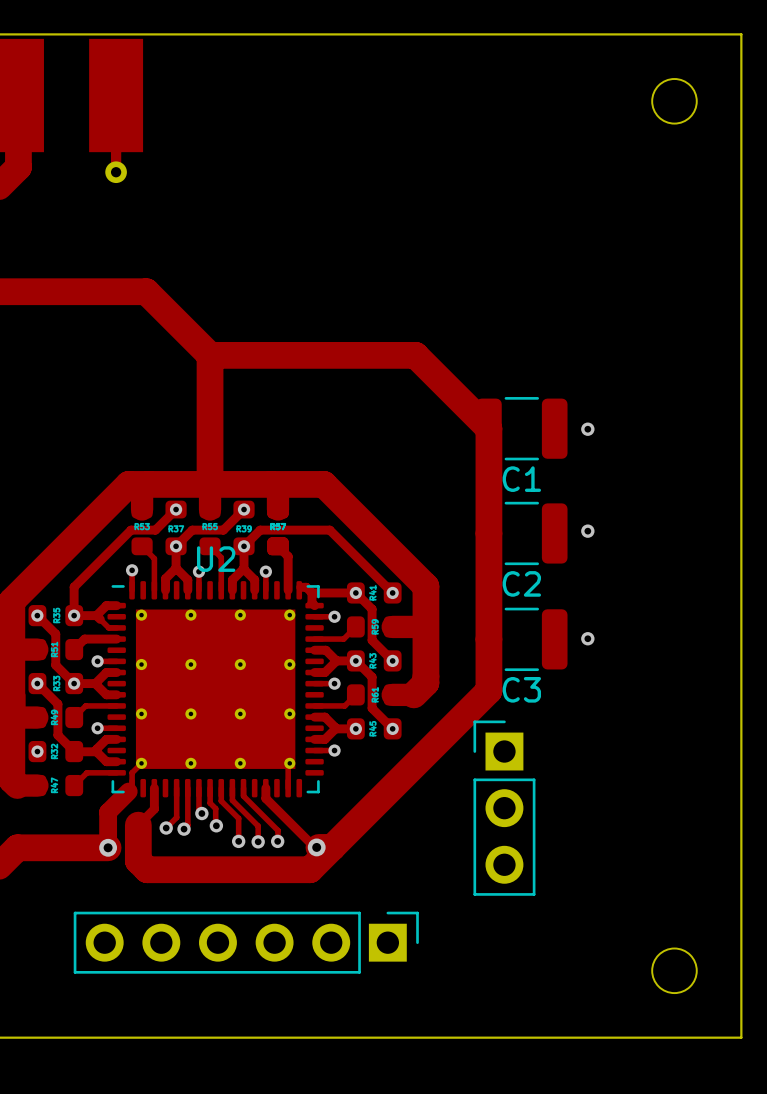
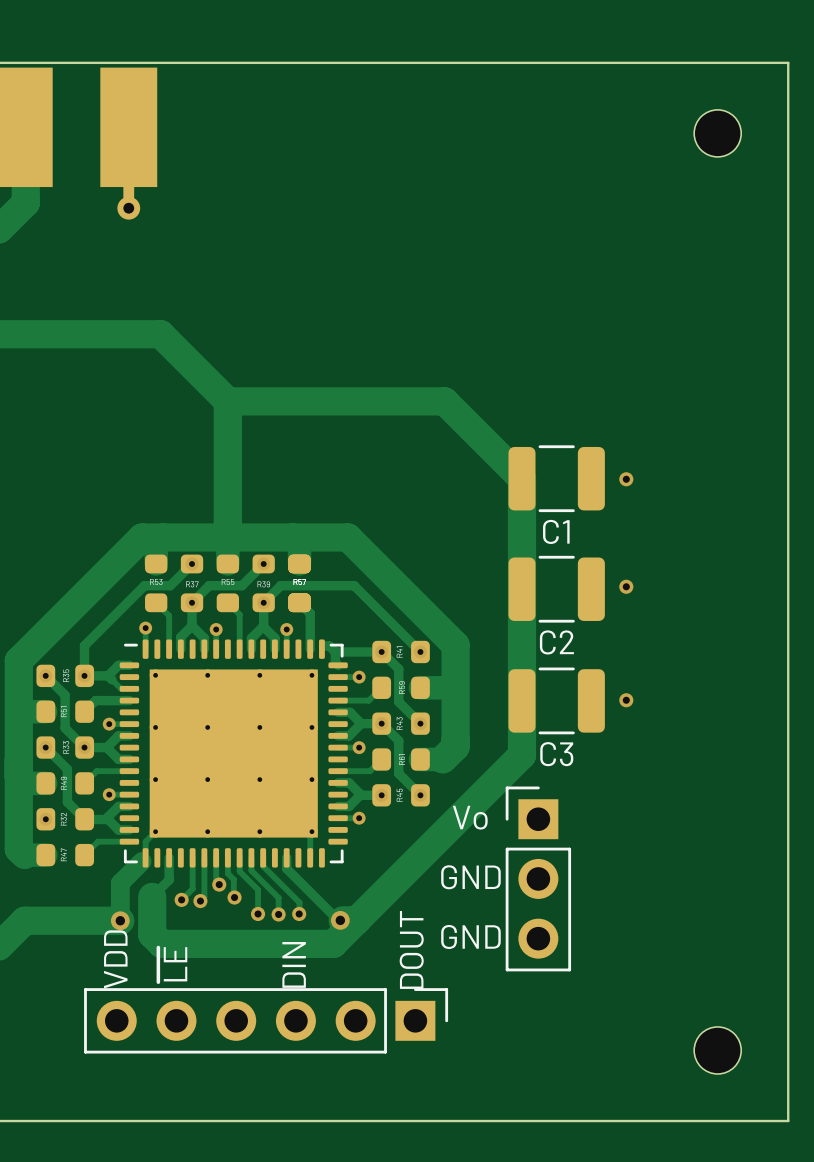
U2 name: U2 (216, 559) -> none
text: none -> Vo (470, 817)
text: none -> GND (470, 877)
text: none -> GND (470, 936)
text: none -> DOUT (411, 949)
text: none -> VDD (115, 959)
text: none -> ~{LE} (172, 964)
text: none -> DIN (294, 964)

